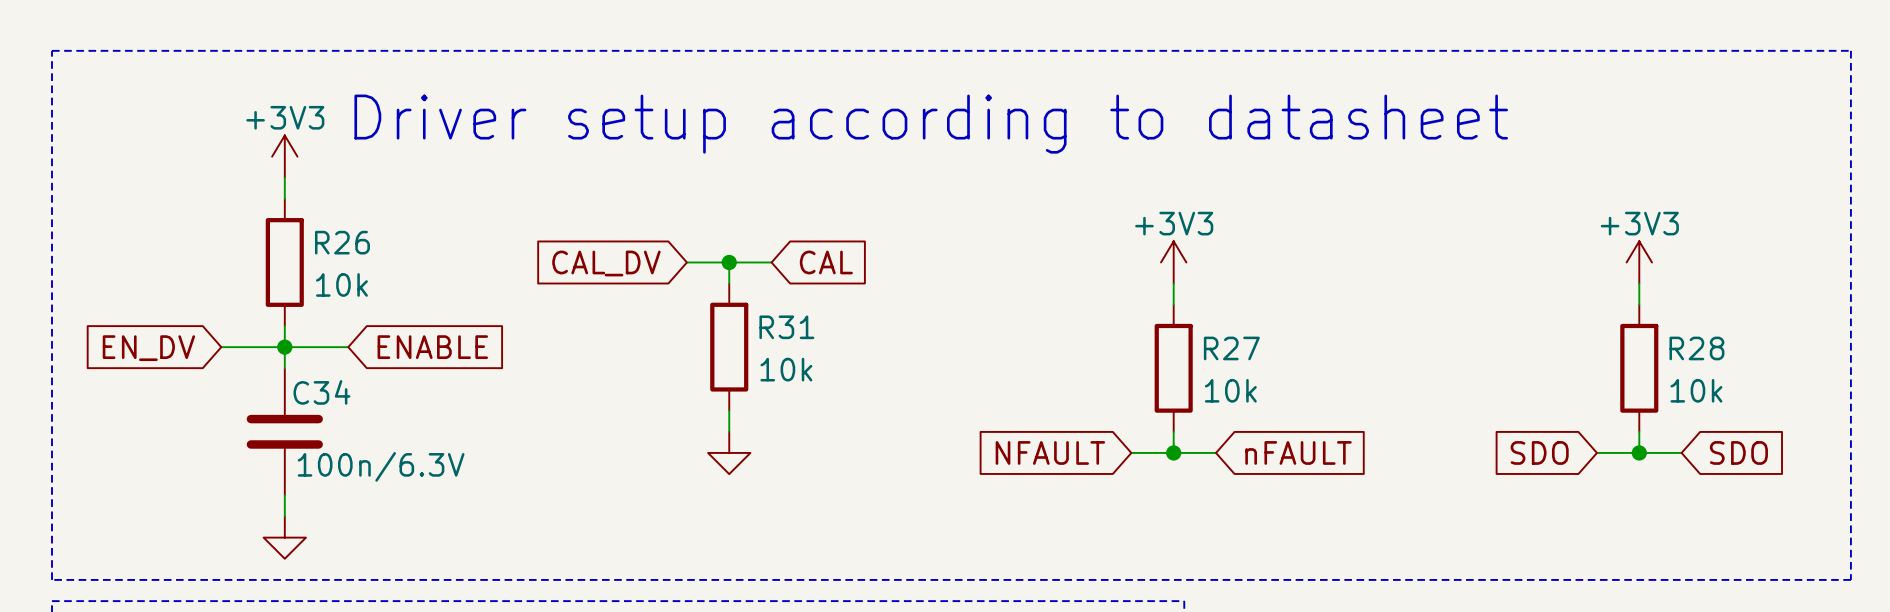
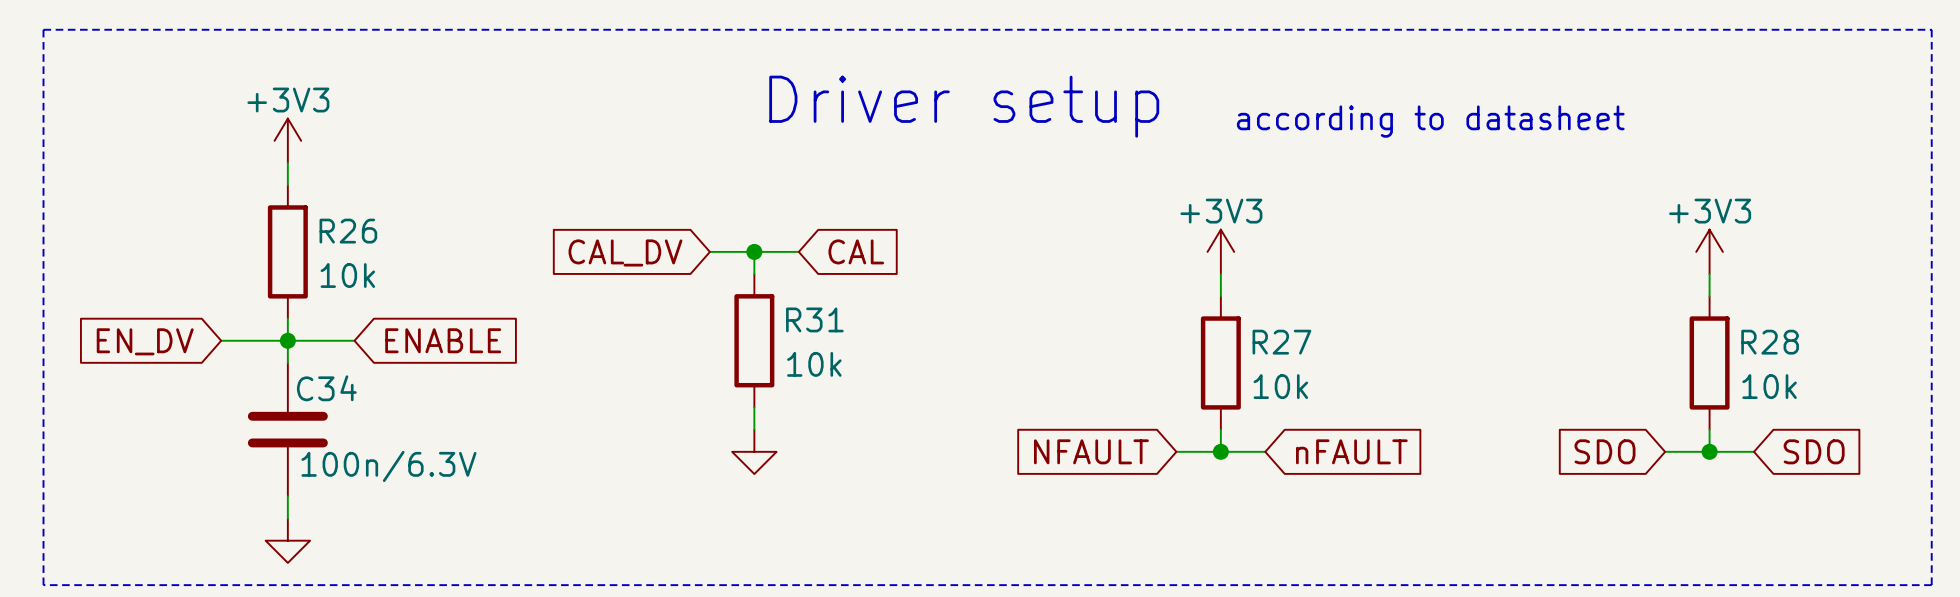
text: Driver setup according to datasheet (931, 124) -> Driver setup (964, 106)
text: none -> according to datasheet (1430, 121)

